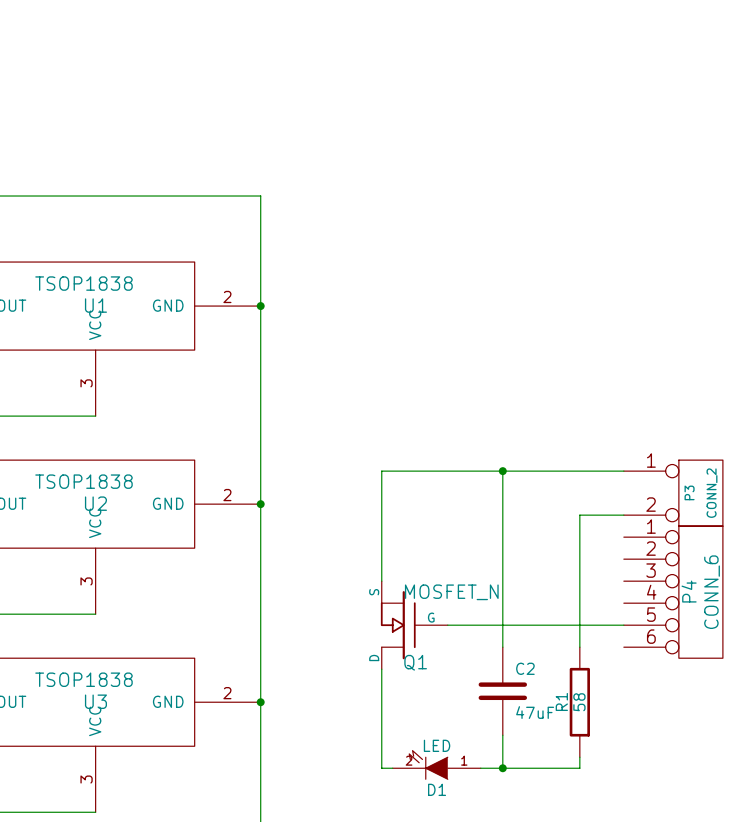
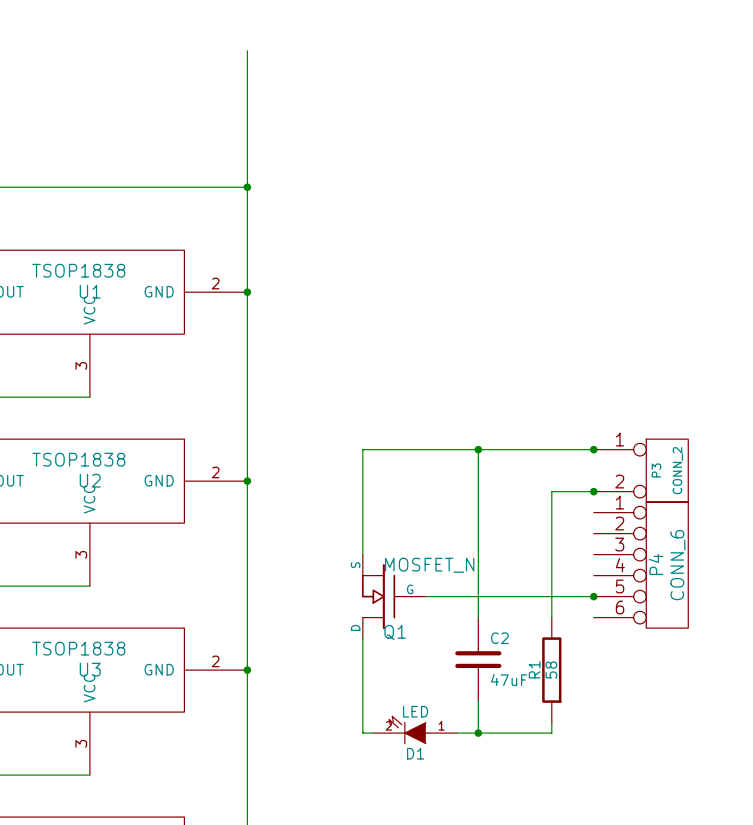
wire: none -> (247, 50) (247, 187)
junction: none -> (247, 187)
junction: none -> (593, 449)
junction: none -> (593, 491)
junction: none -> (593, 596)

